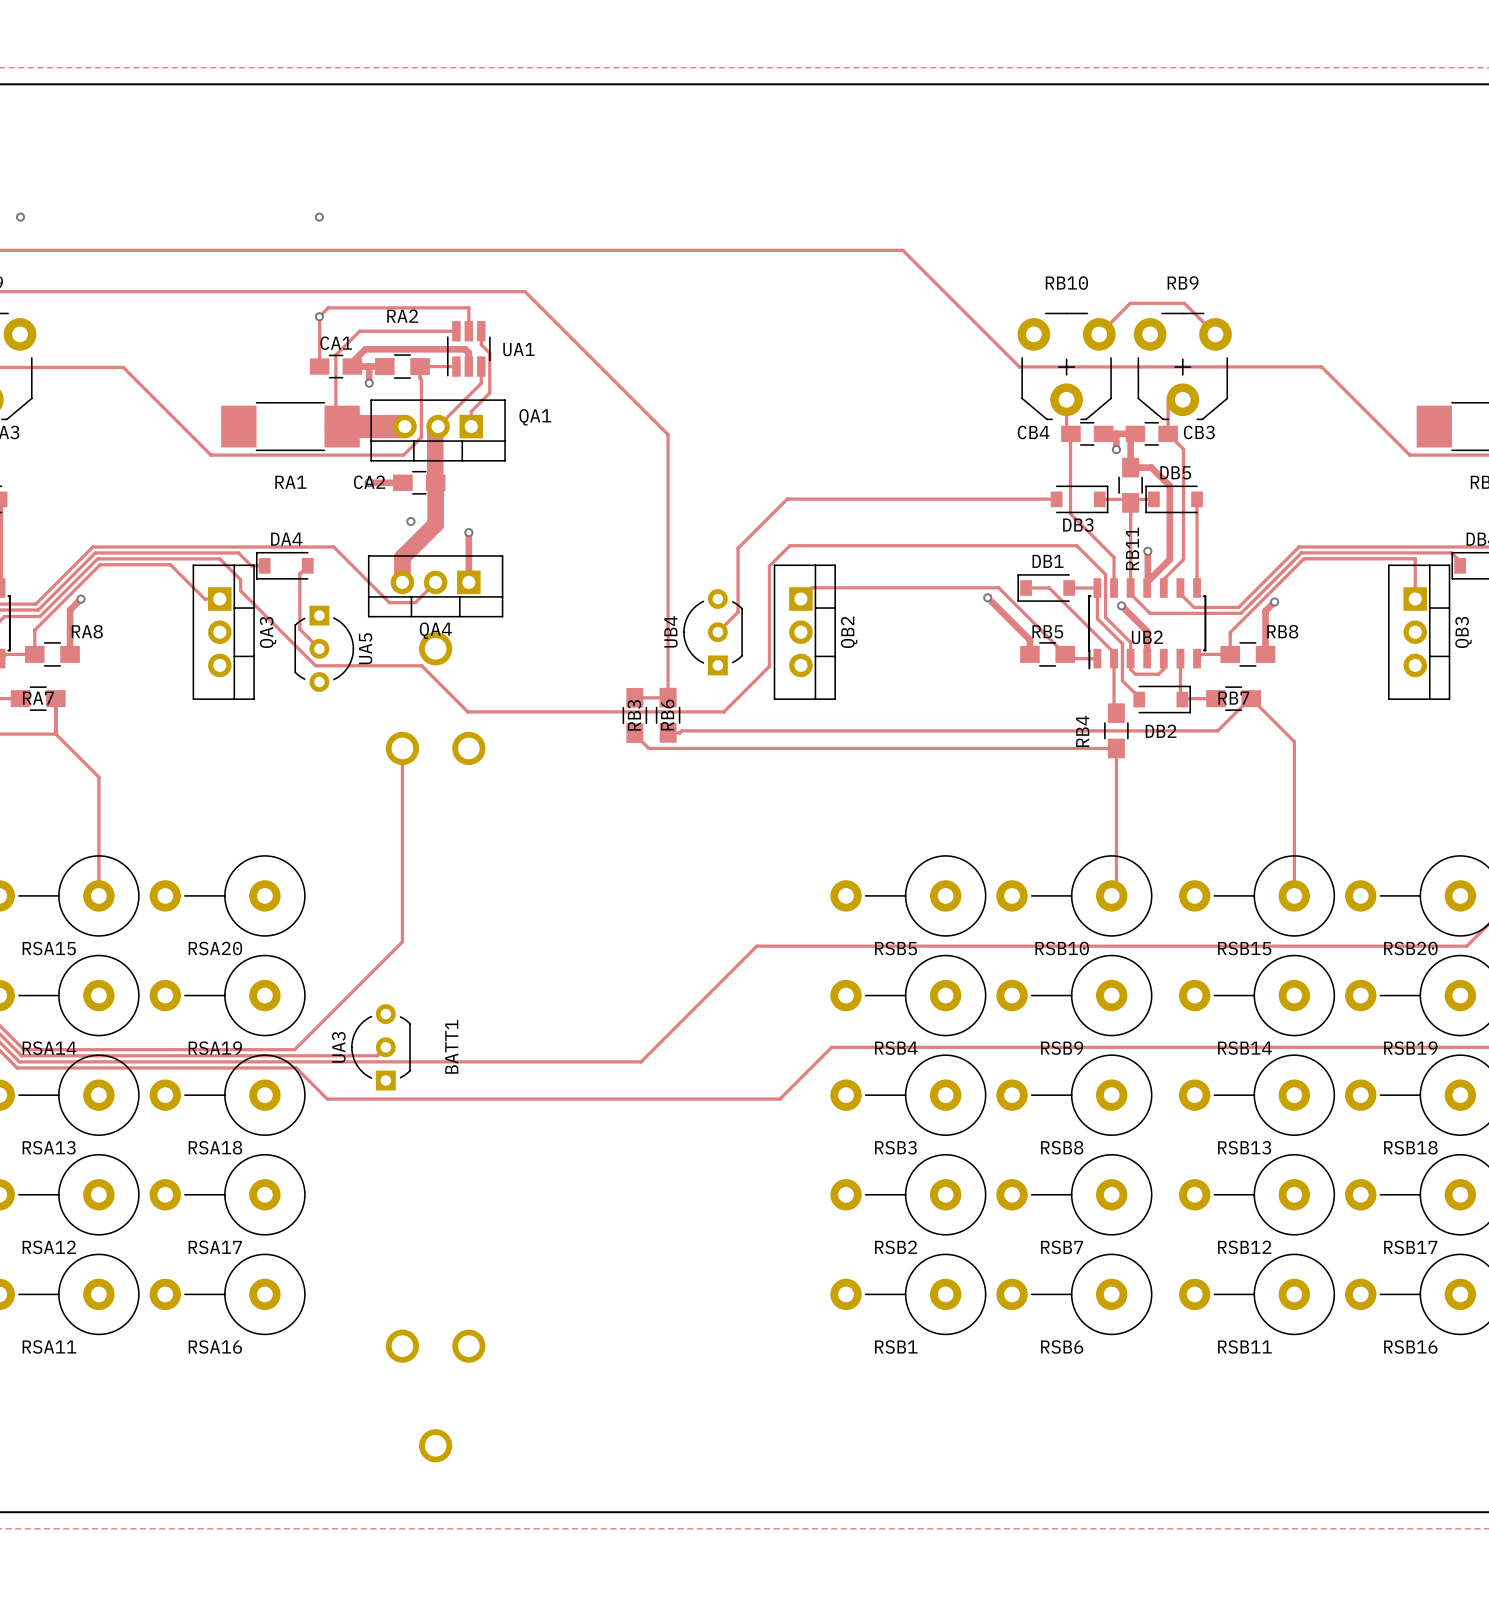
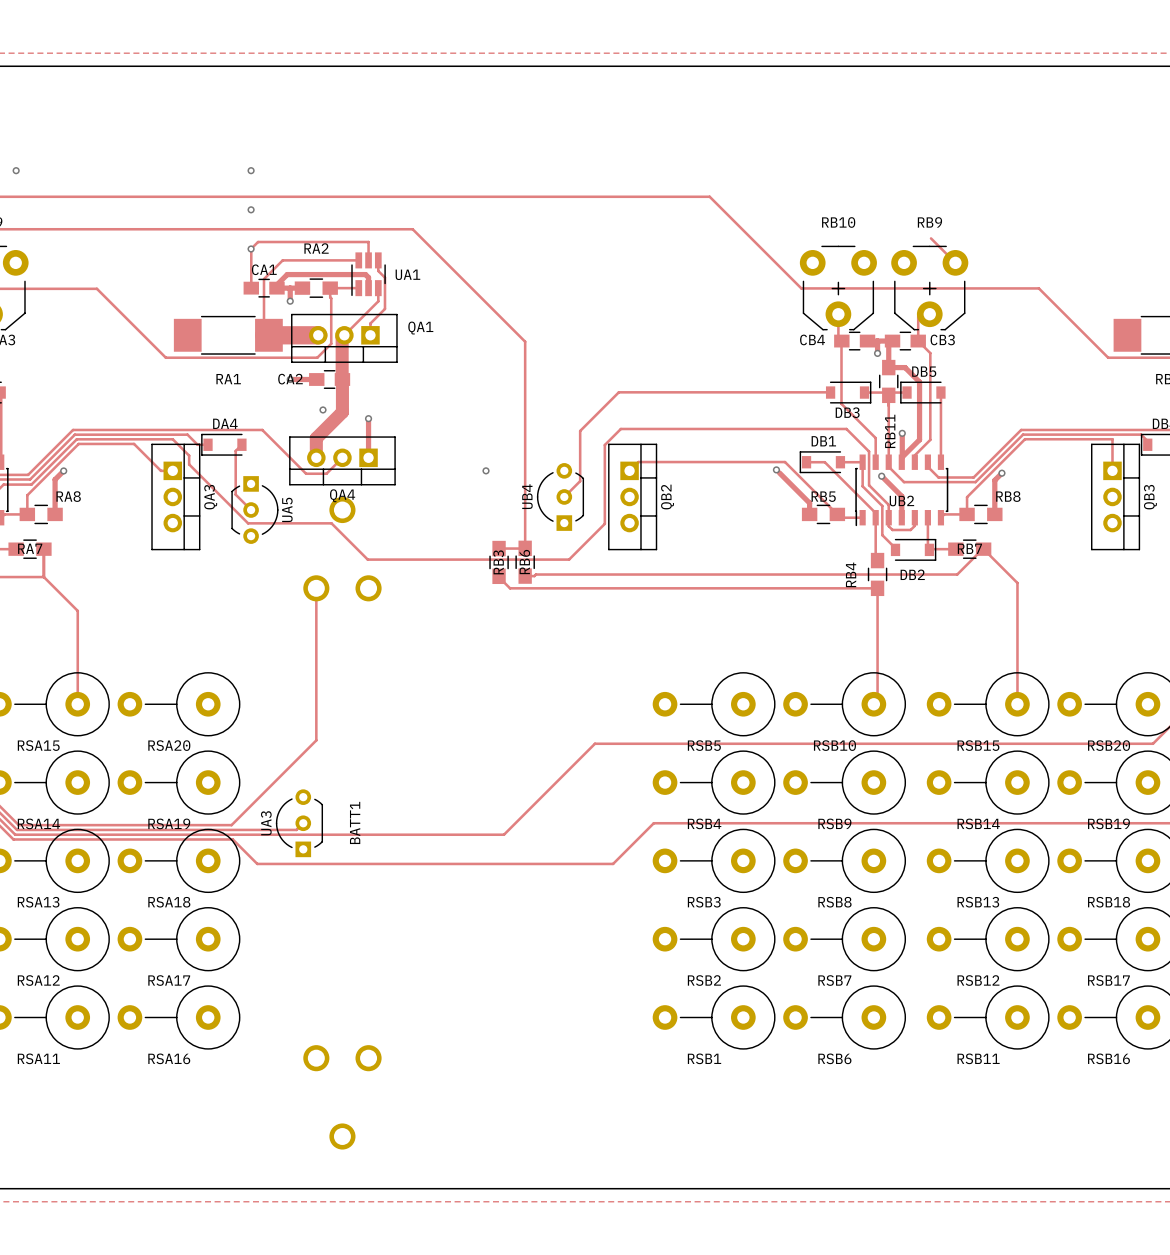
via: none -> (251, 209)
track: (1184, 303) (1130, 303) (1099, 334) -> none
via: none -> (486, 470)

